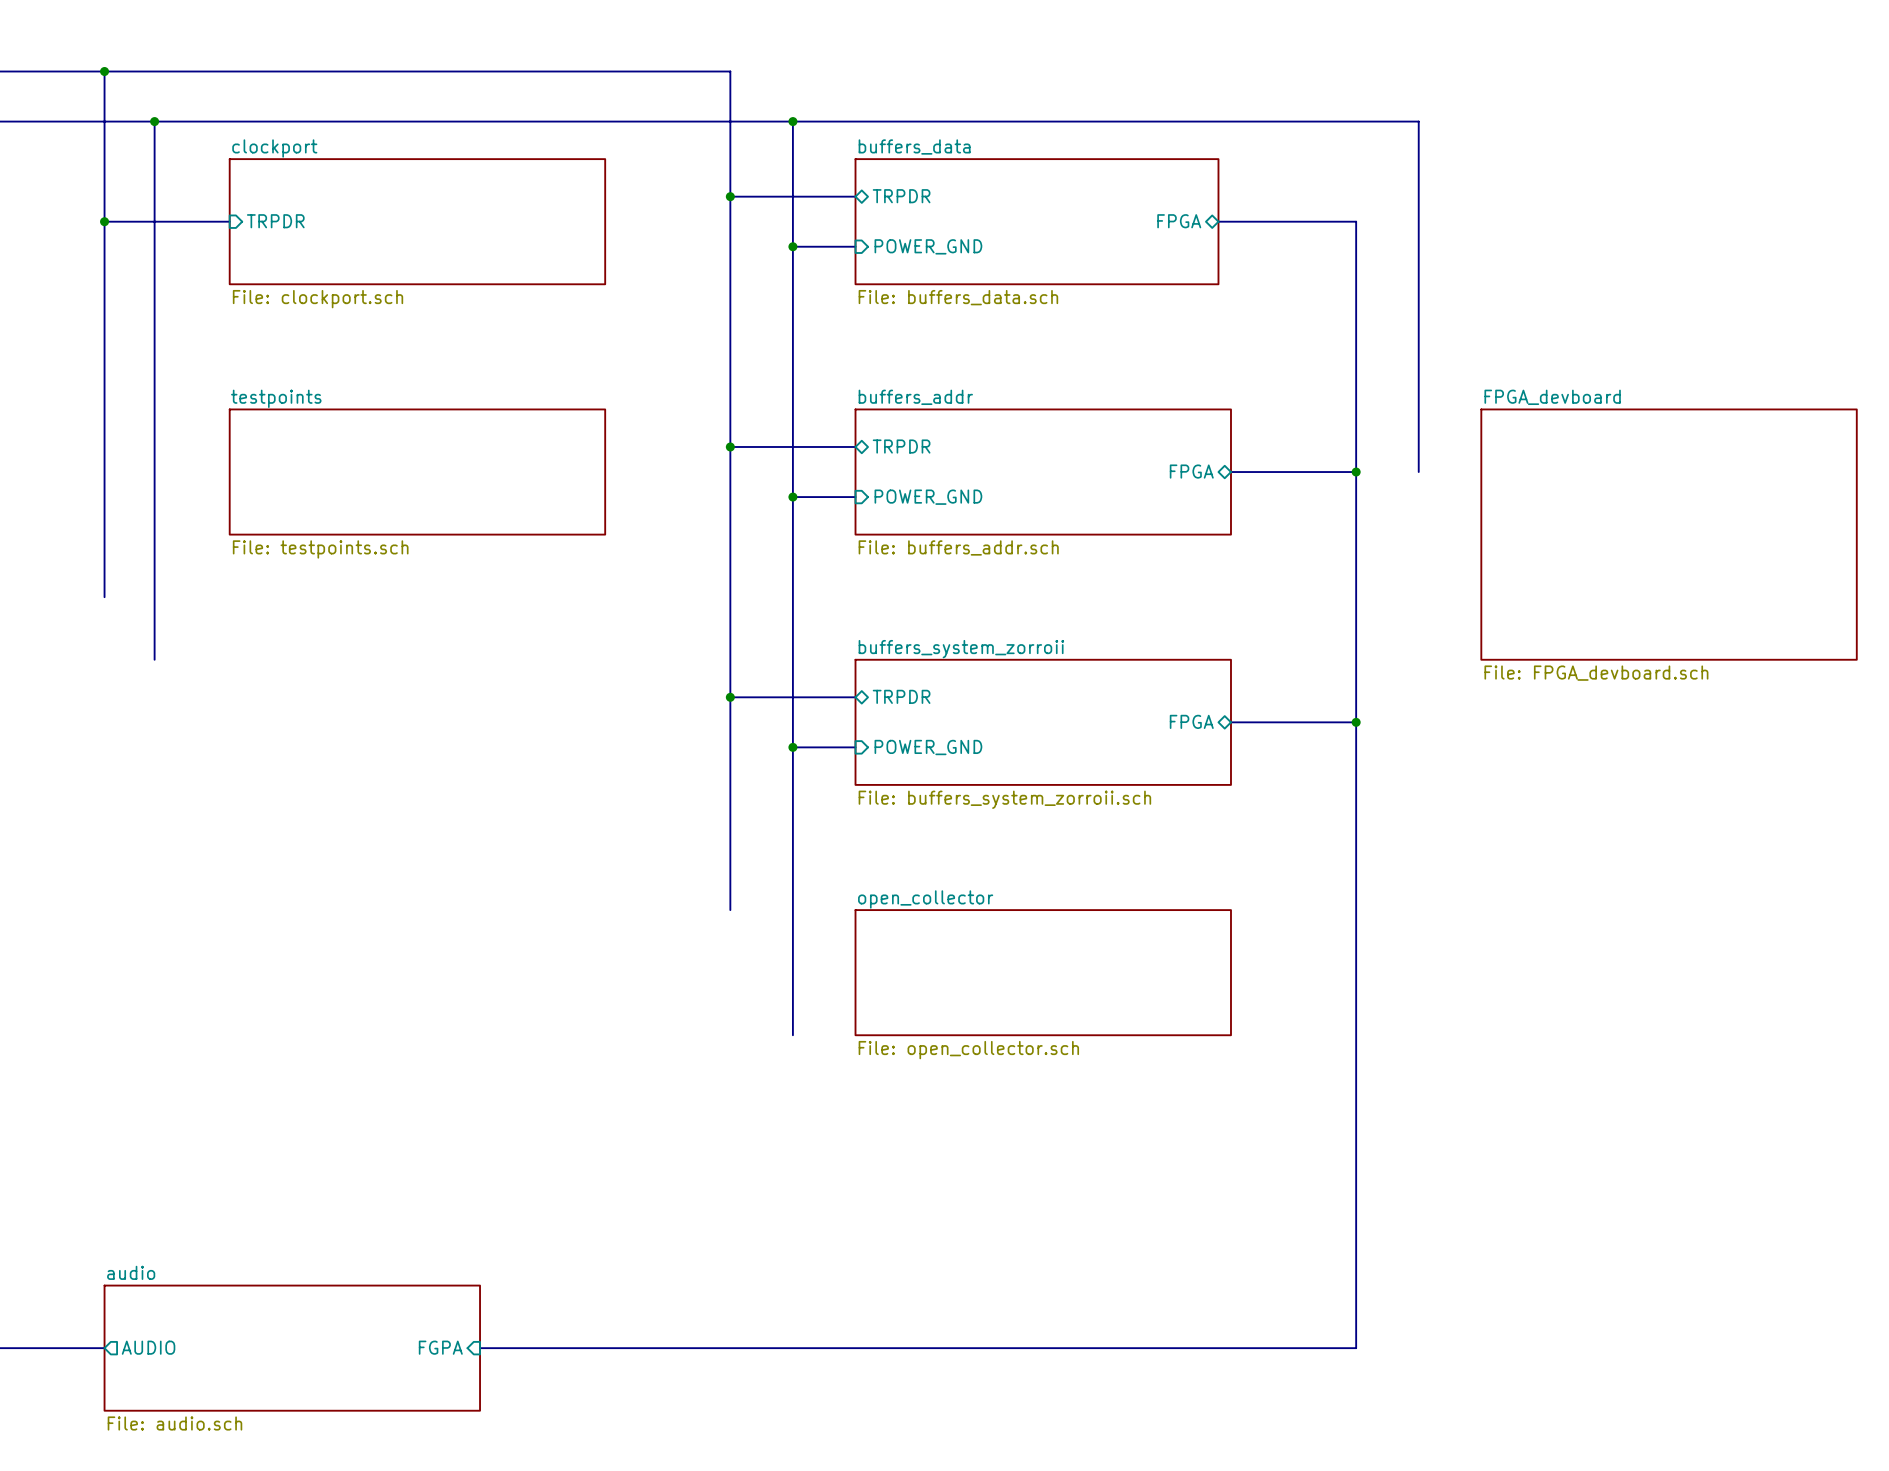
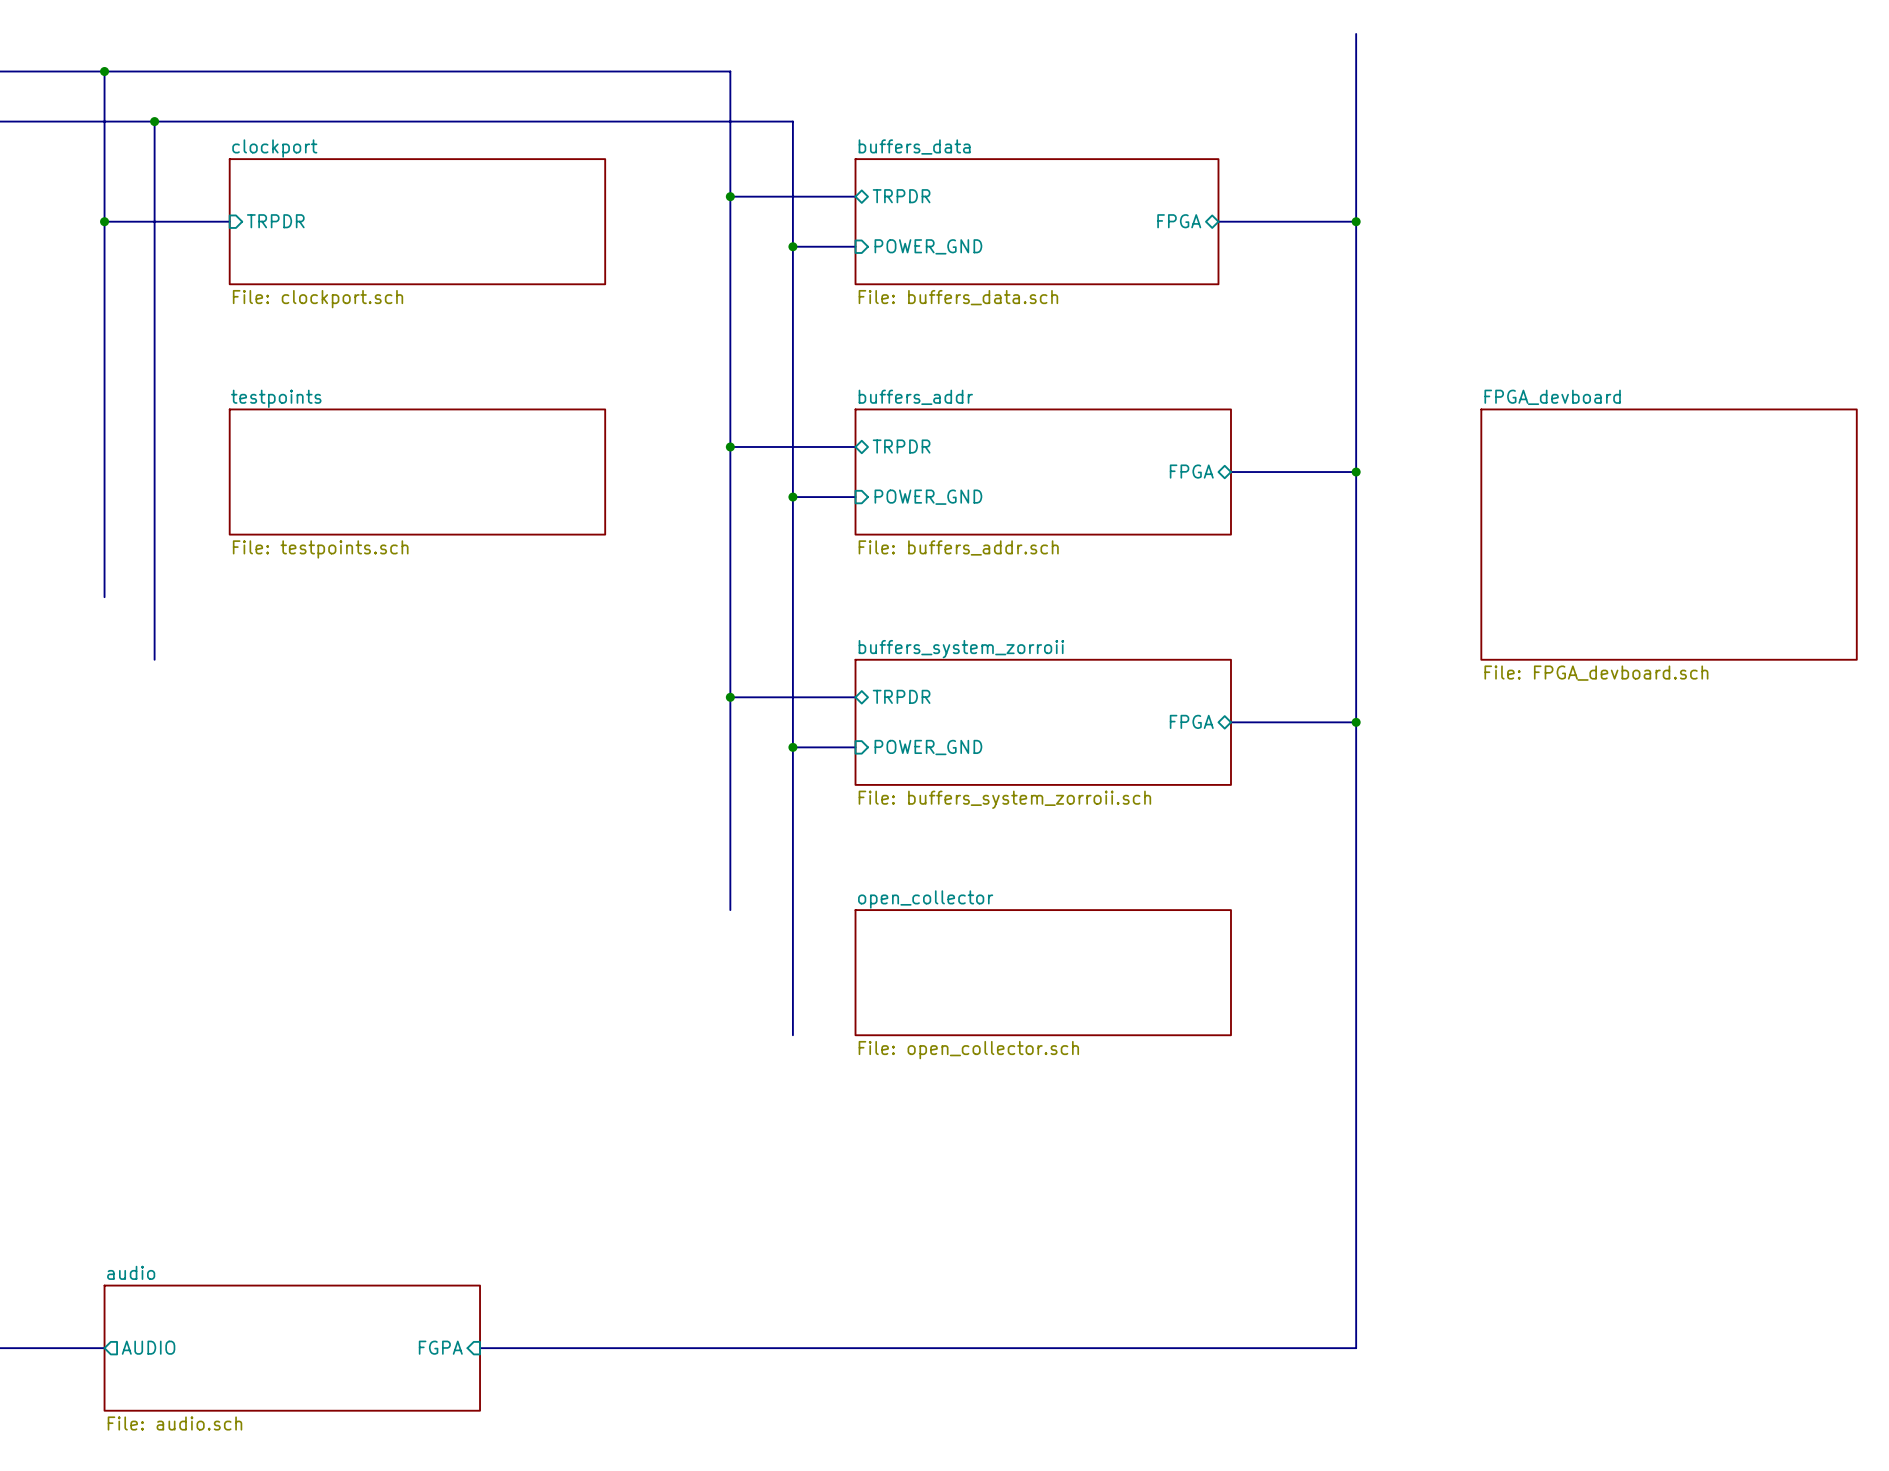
bus: none -> (1356, 33) (1356, 221)
bus: (792, 121) (1418, 121) (1418, 472) -> none
junction: (792, 121) -> none
junction: none -> (1356, 221)

